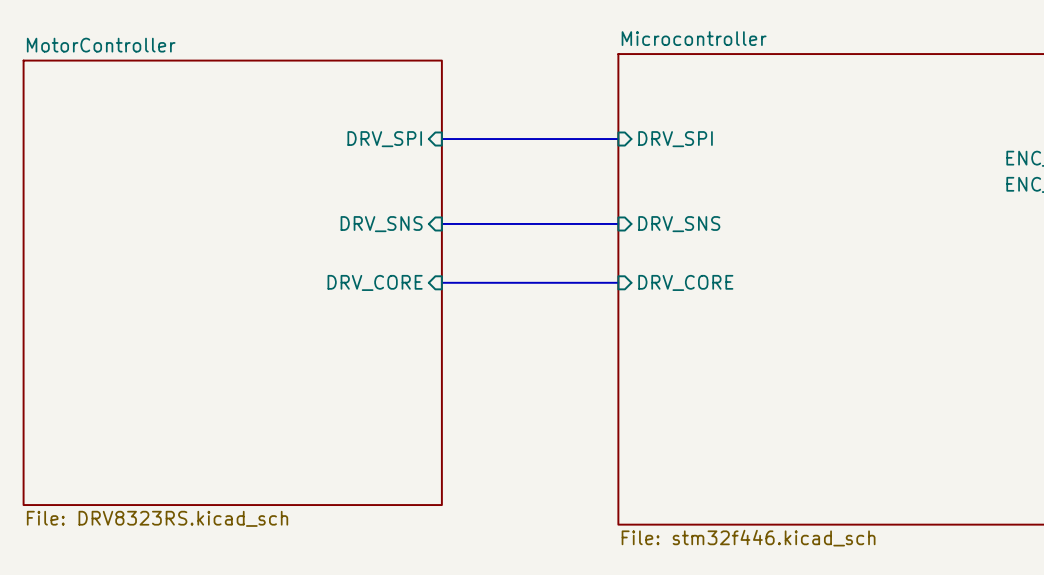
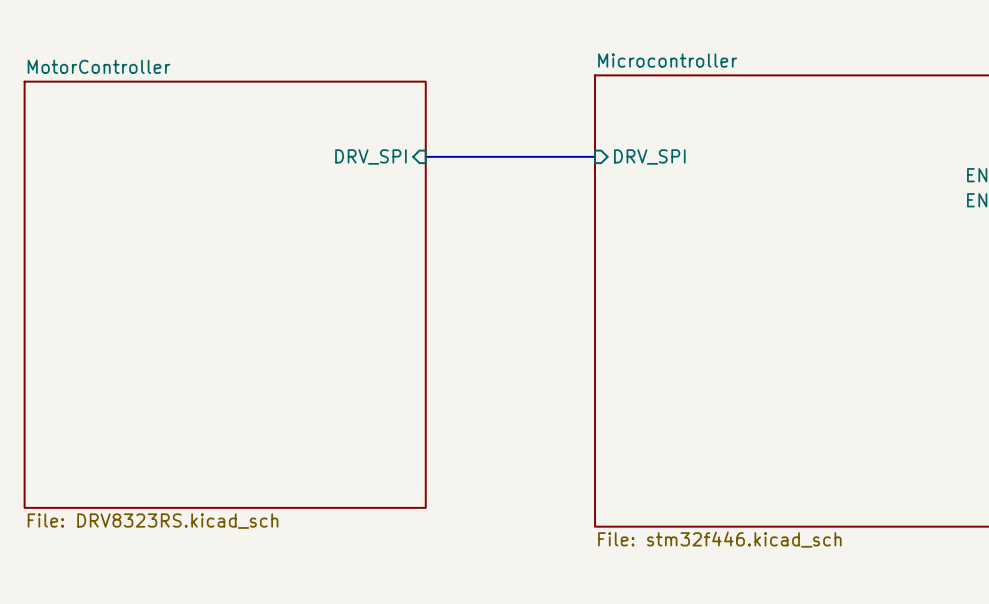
bus: (441, 223) (618, 223) -> none
sheet pin: DRV_SNS (381, 224) -> none
sheet pin: DRV_SNS (679, 224) -> none
sheet pin: DRV_CORE (375, 282) -> none
bus: (441, 282) (618, 282) -> none
sheet pin: DRV_CORE (685, 282) -> none

